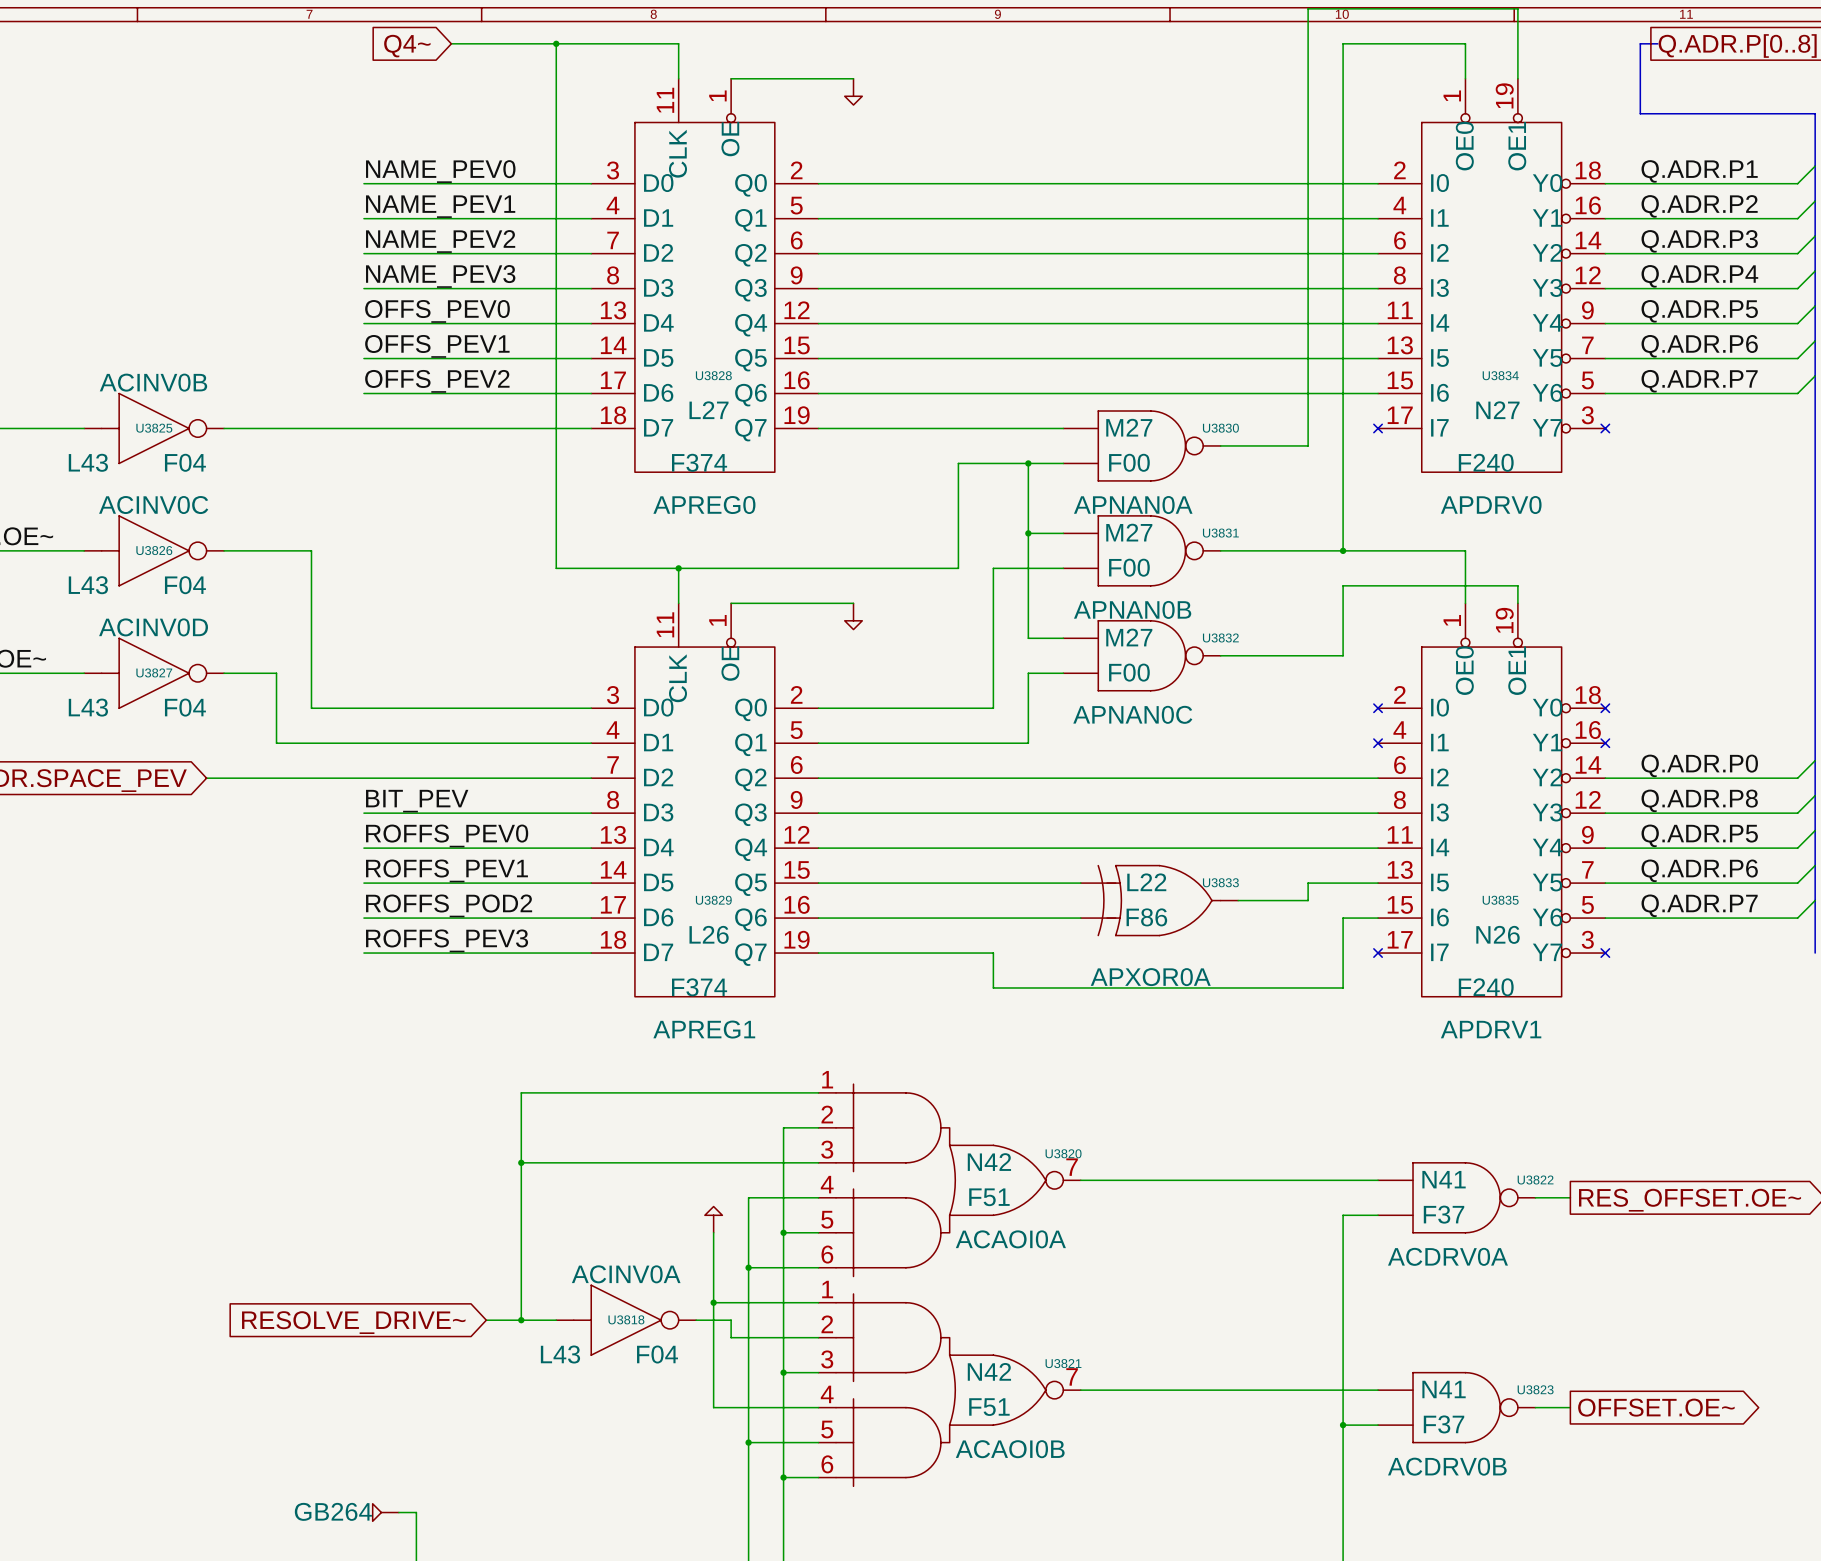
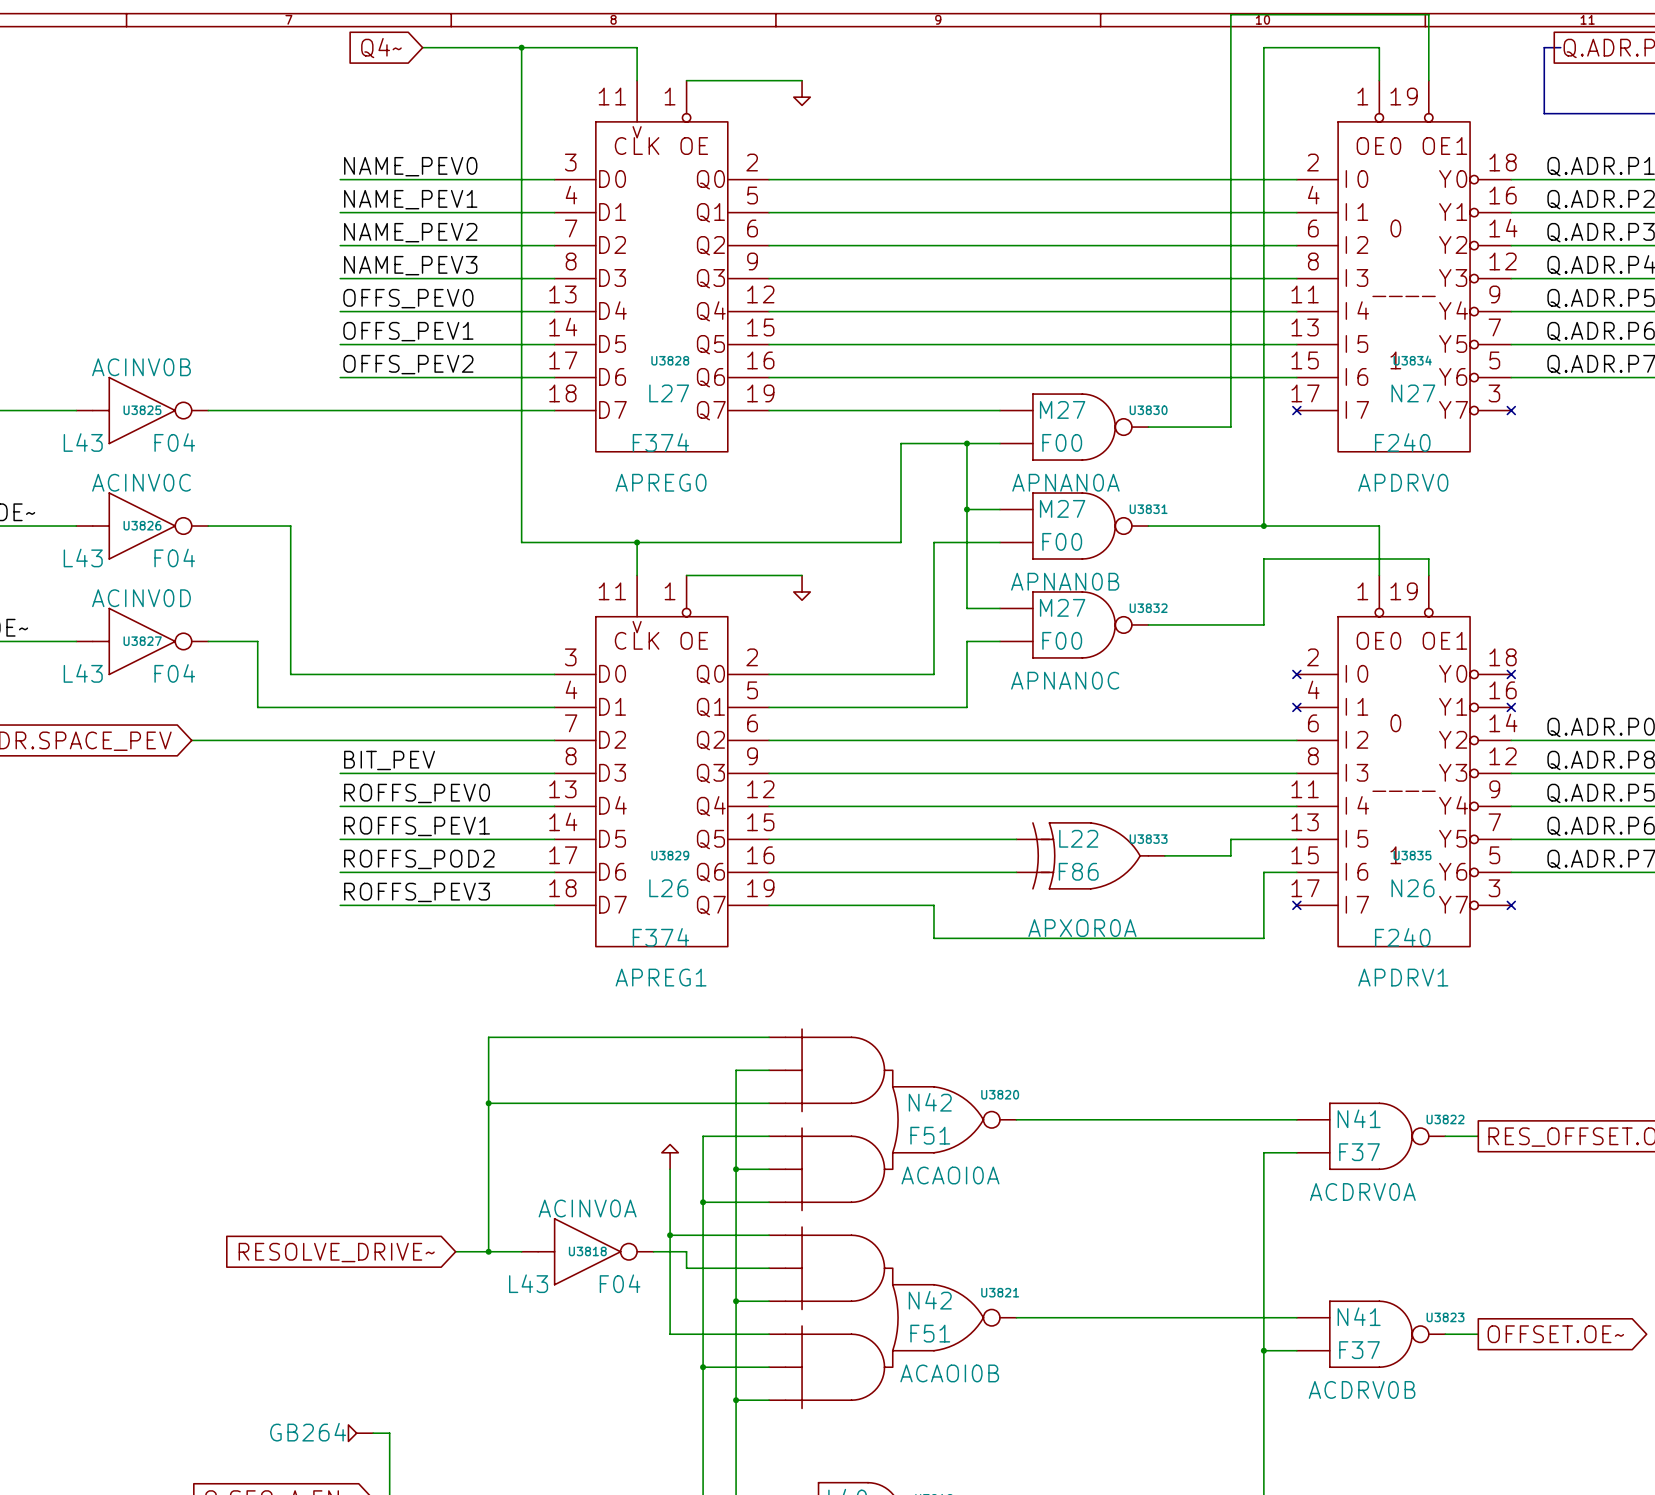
U3828 symbol: [591, 78, 819, 473] -> [554, 80, 770, 452]
U3834 symbol: [1378, 78, 1606, 473] -> [1296, 80, 1512, 452]
U3829 symbol: [591, 603, 819, 997] -> [554, 575, 770, 947]
U3835 symbol: [1378, 603, 1606, 997] -> [1296, 575, 1512, 947]
U3820 pin number: 1 (827, 1079) -> none
U3820 pin number: 2 (827, 1114) -> none
U3820 pin number: 3 (827, 1149) -> none
U3820 pin number: 7 (1072, 1167) -> none
U3820 pin number: 4 (827, 1184) -> none
U3820 pin number: 5 (827, 1219) -> none
U3820 pin number: 6 (827, 1254) -> none
U3821 pin number: 1 (827, 1289) -> none
U3821 pin number: 2 (827, 1324) -> none
U3821 pin number: 3 (827, 1359) -> none
U3821 pin number: 7 (1072, 1376) -> none
U3821 pin number: 4 (827, 1394) -> none
U3821 pin number: 5 (827, 1429) -> none
U3821 pin number: 6 (827, 1464) -> none

